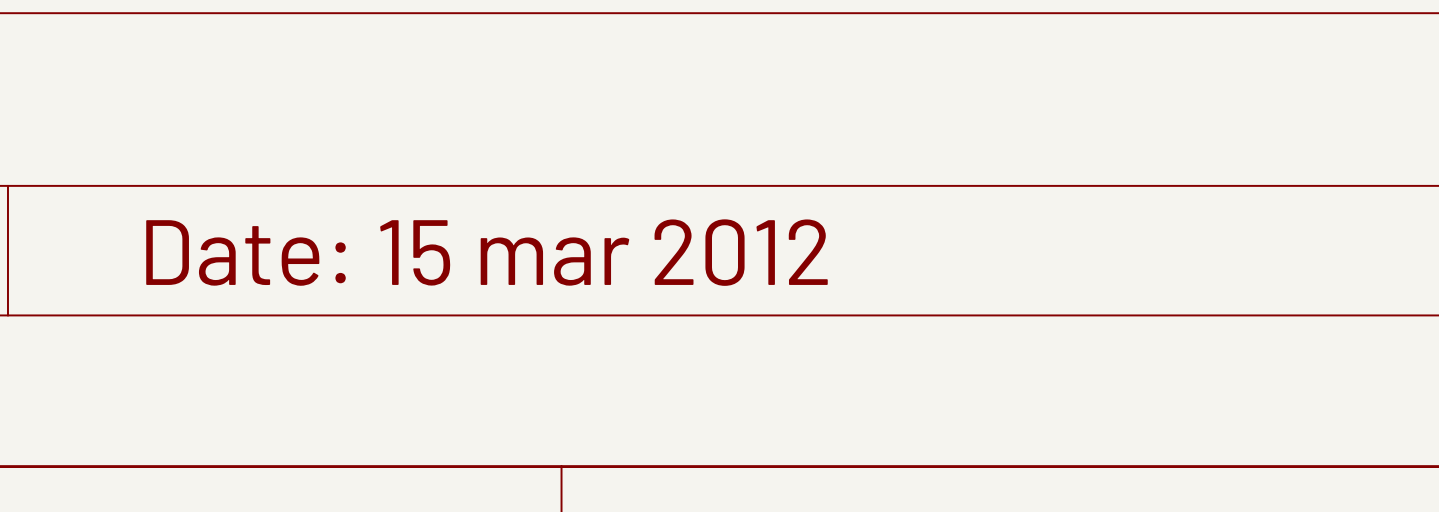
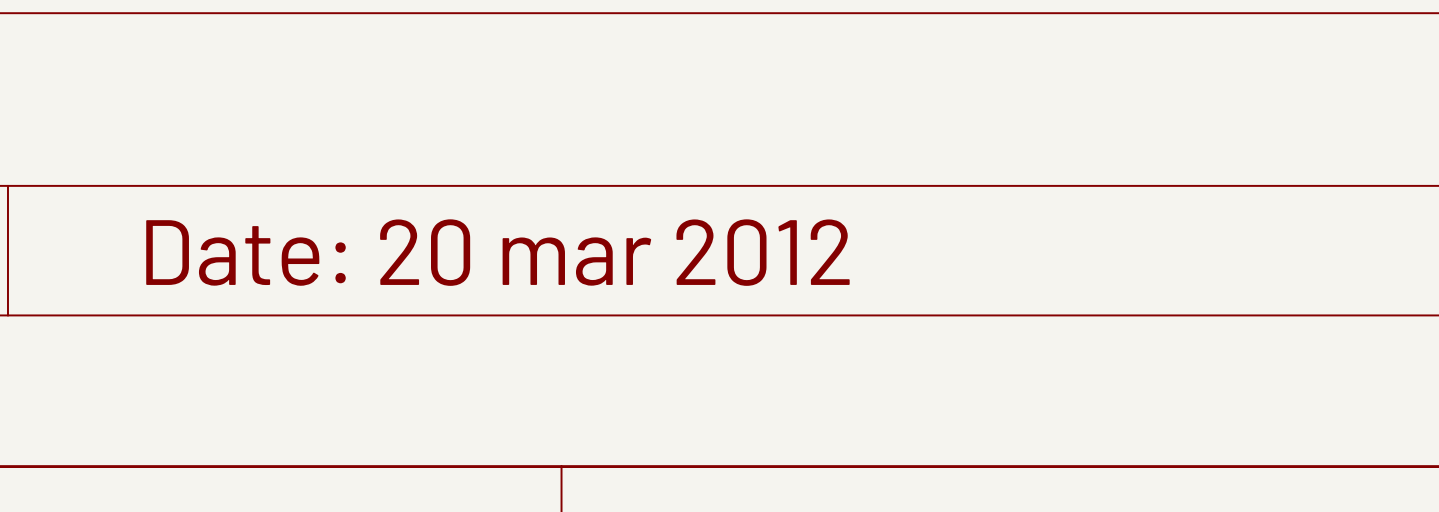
title block: Date: 15 mar 2012 (486, 252) -> Date: 20 mar 2012 (497, 252)

